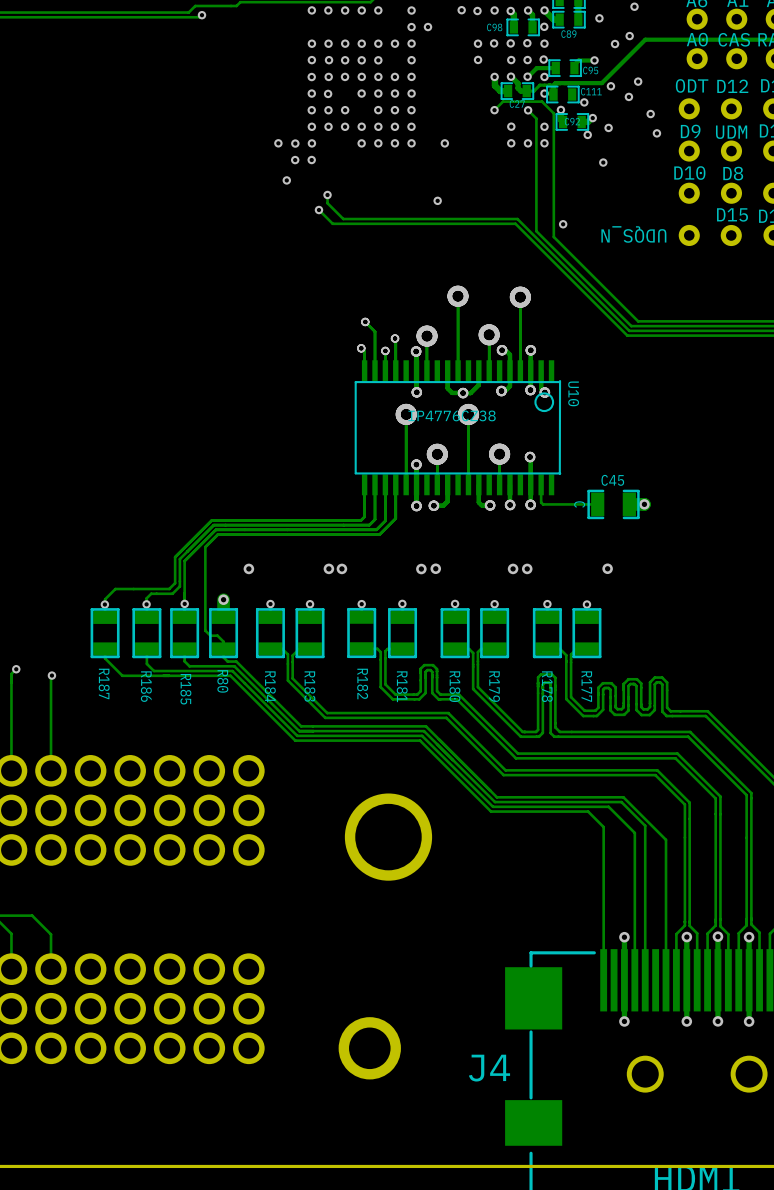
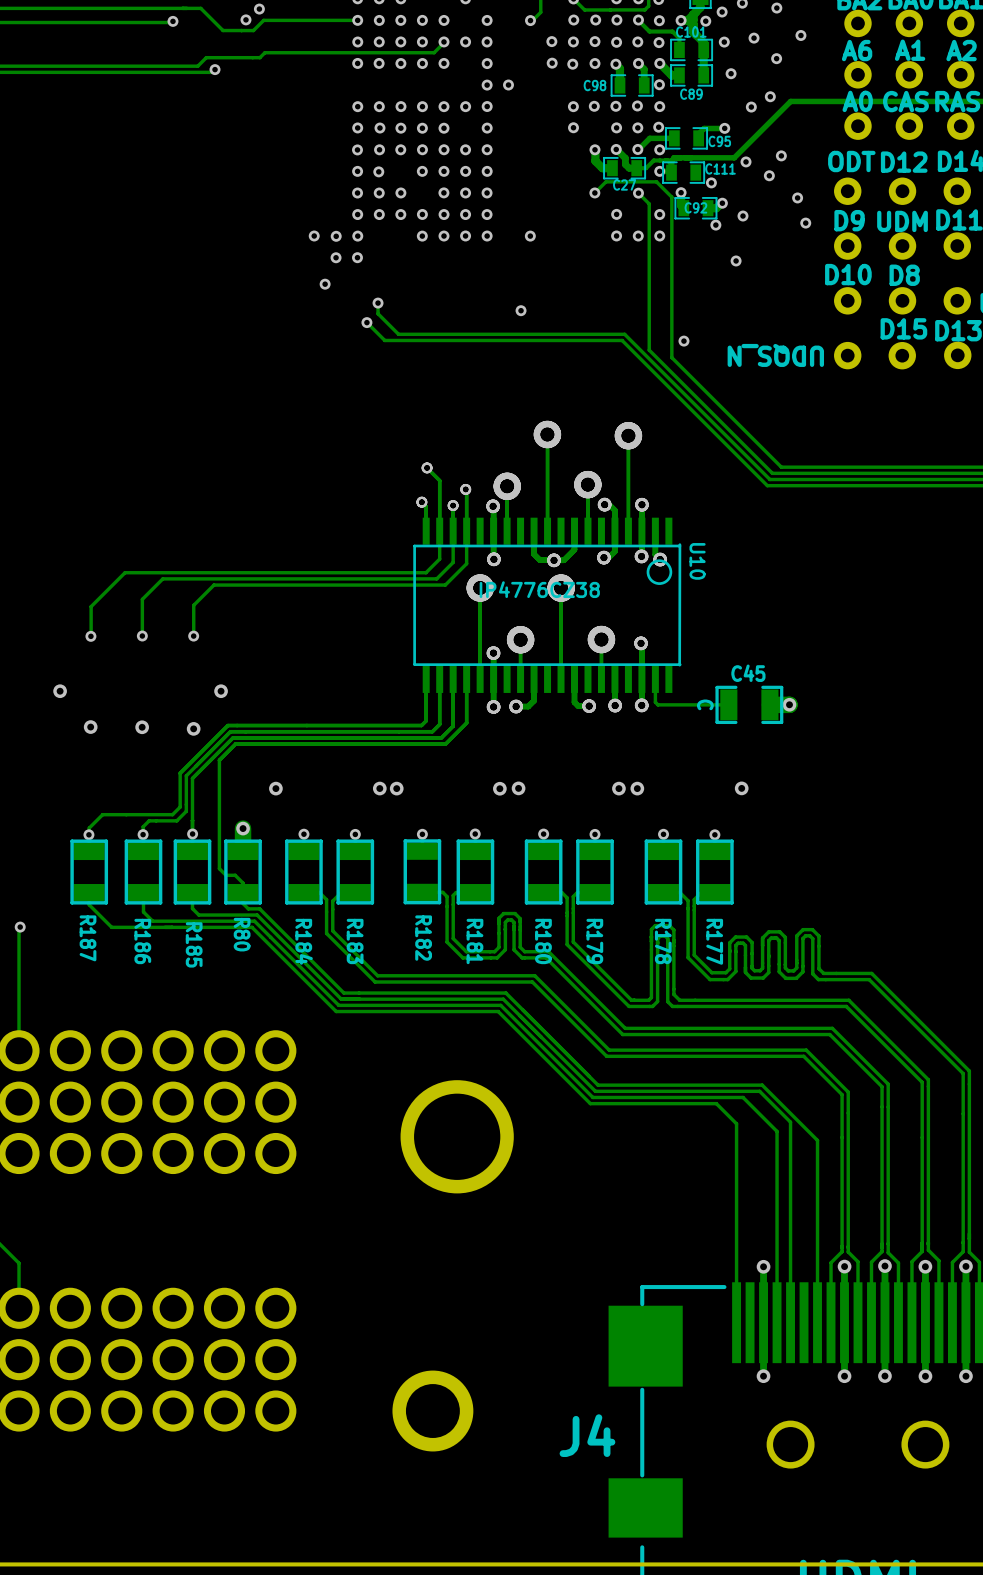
track: none -> (439, 531) (439, 559) (426, 572) (125, 572) (91, 606) (91, 636)
track: none -> (453, 531) (453, 562) (436, 578) (162, 578) (142, 599) (142, 636)
track: none -> (466, 531) (466, 563) (445, 585) (214, 585) (193, 605) (193, 636)
via: none -> (90, 636)
via: none -> (142, 636)
via: none -> (193, 636)
via: none -> (60, 691)
via: none -> (221, 691)
via: none -> (90, 727)
via: none -> (142, 727)
via: none -> (193, 728)

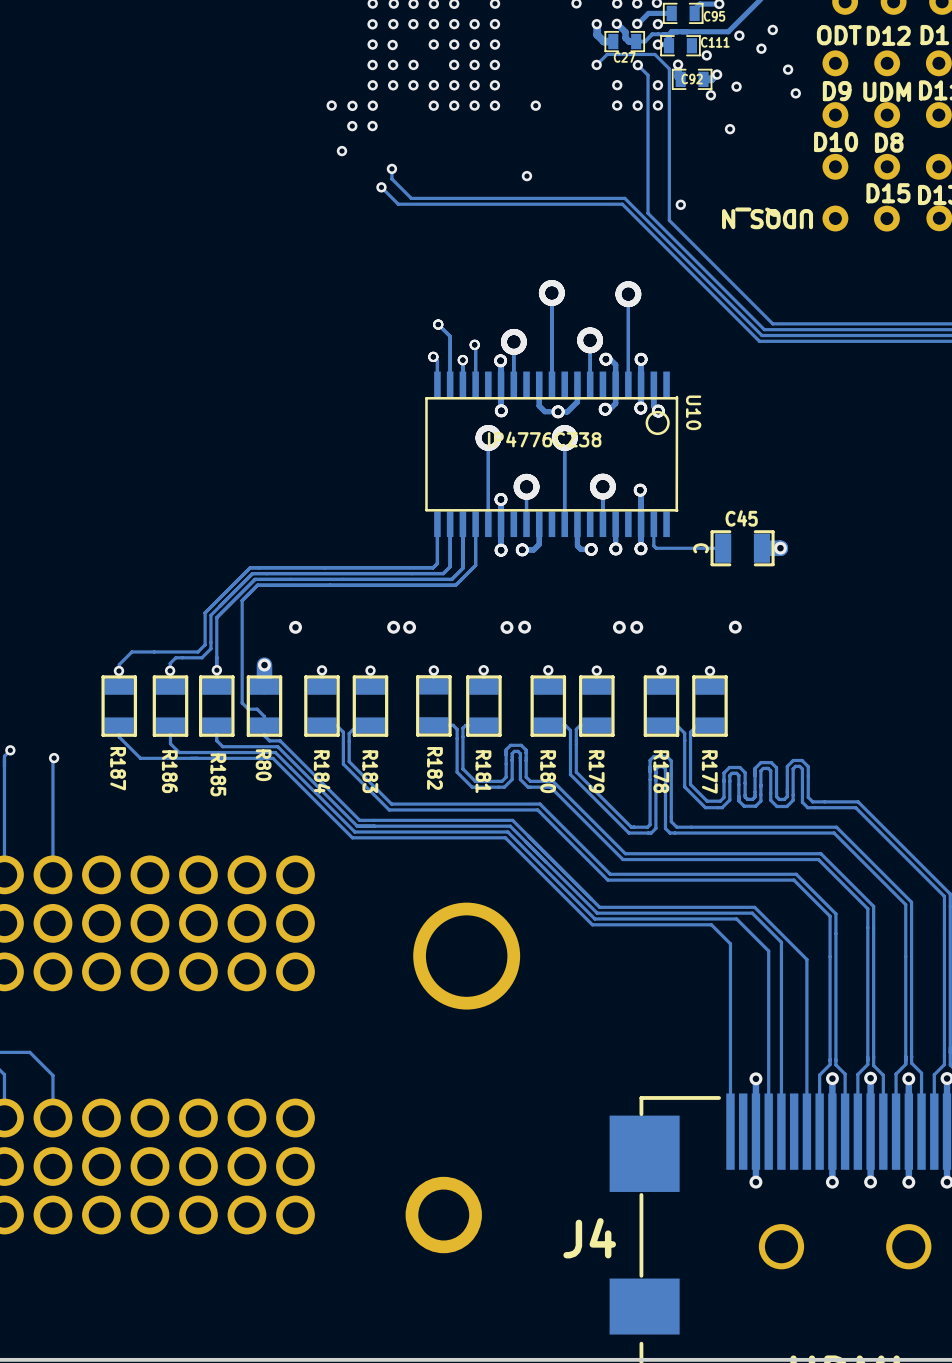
track: (439, 531) (439, 559) (426, 572) (125, 572) (91, 606) (91, 636) -> none
track: (453, 531) (453, 562) (436, 578) (162, 578) (142, 599) (142, 636) -> none
track: (466, 531) (466, 563) (445, 585) (214, 585) (193, 605) (193, 636) -> none
via: (90, 636) -> none
via: (142, 636) -> none
via: (193, 636) -> none
via: (60, 691) -> none
via: (221, 691) -> none
via: (90, 727) -> none
via: (142, 727) -> none
via: (193, 728) -> none

